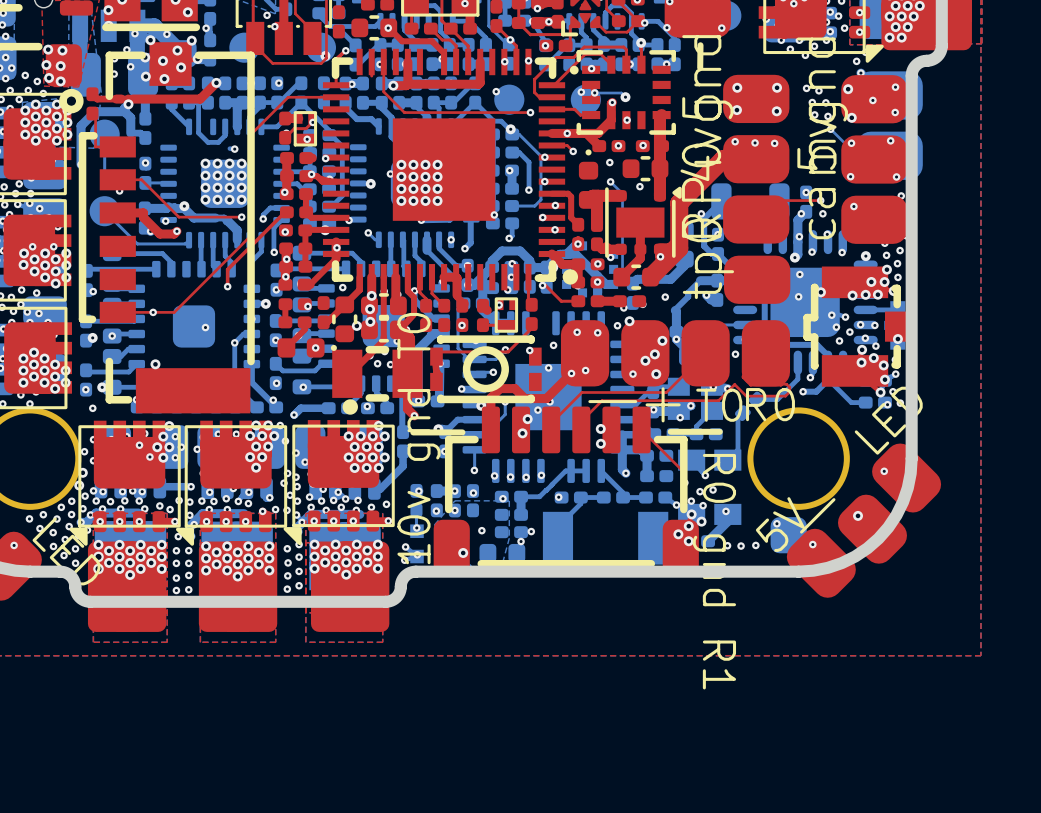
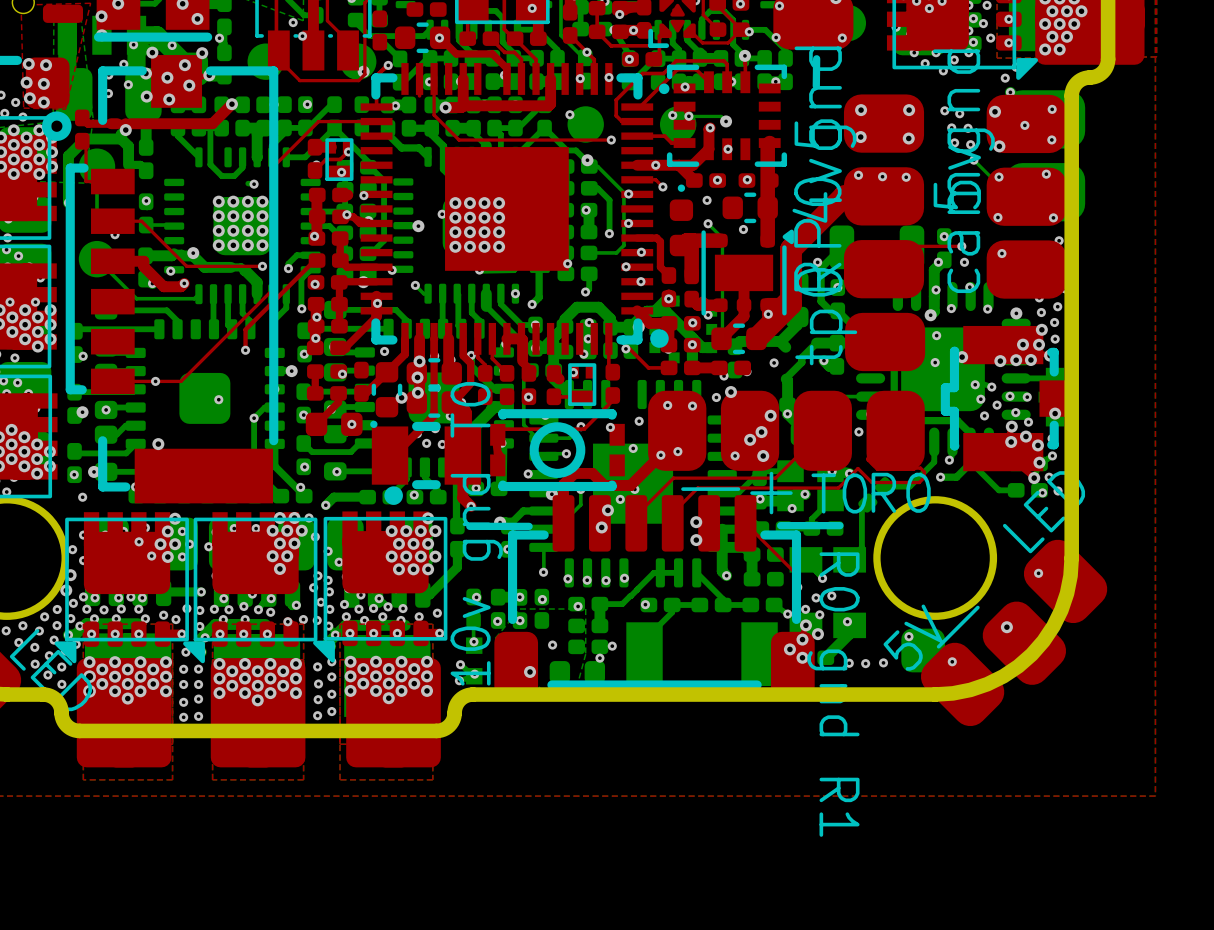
bottom track: none -> (779, 341) (785, 347)

